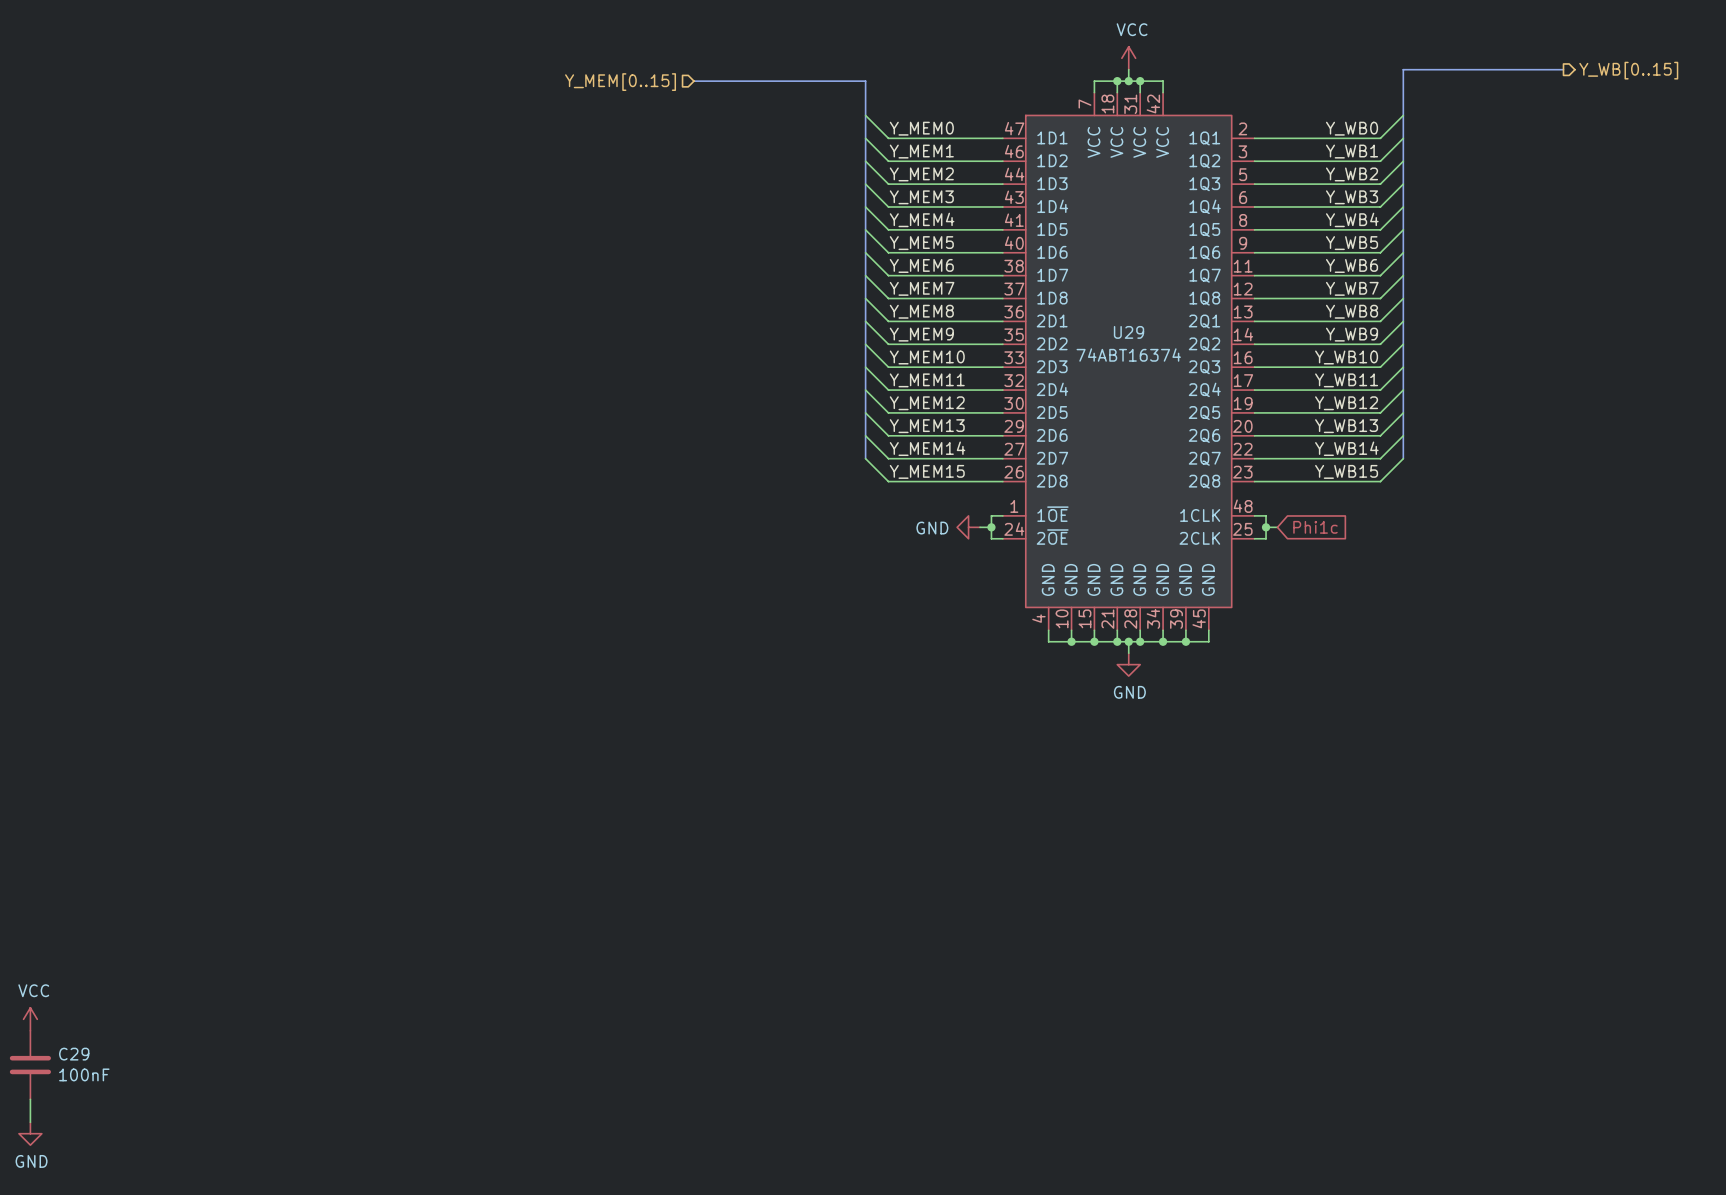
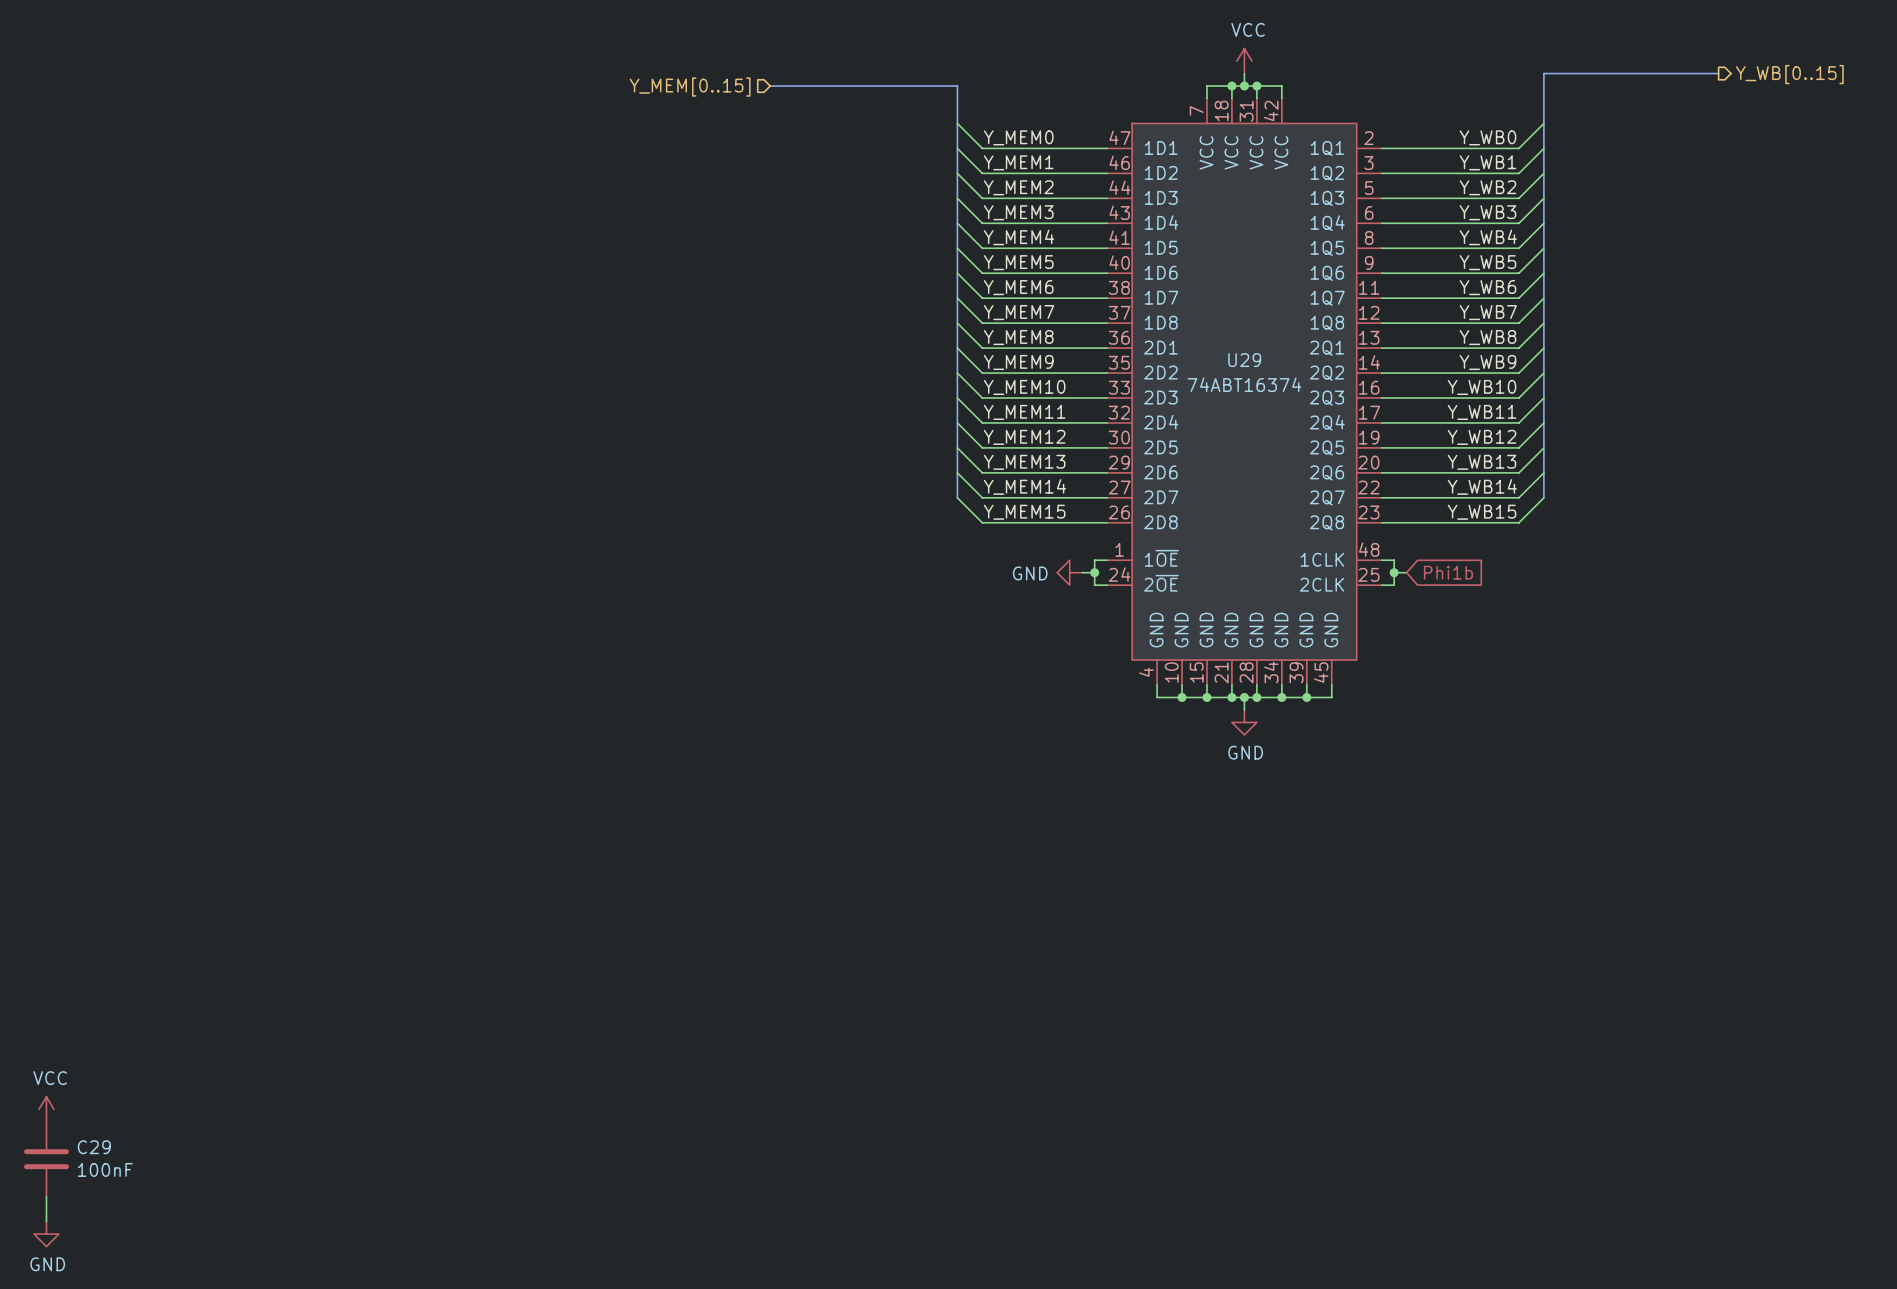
global label: Phi1c (1315, 527) -> Phi1b (1448, 572)

